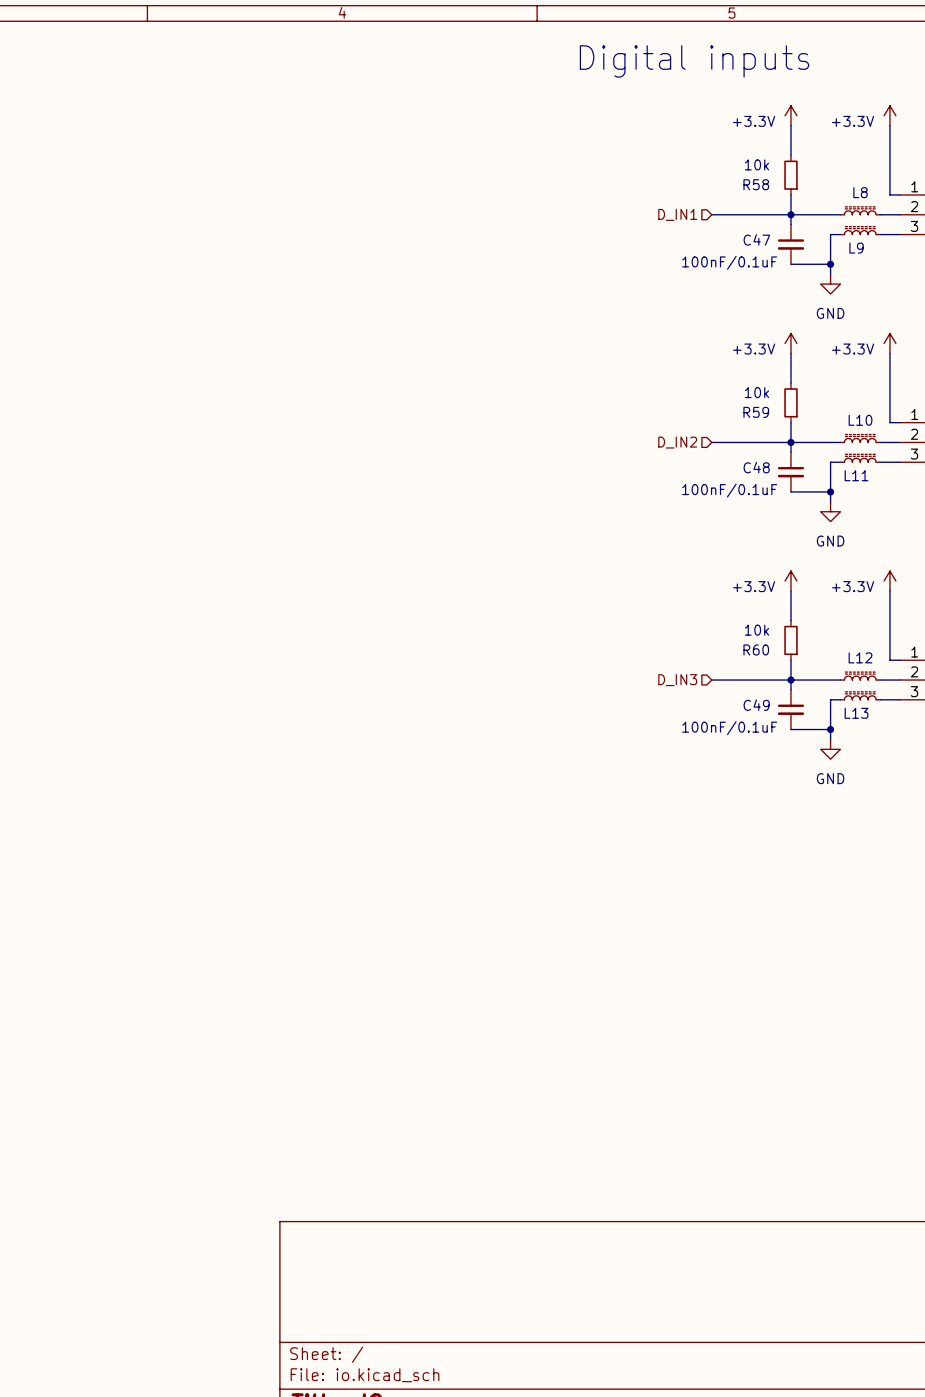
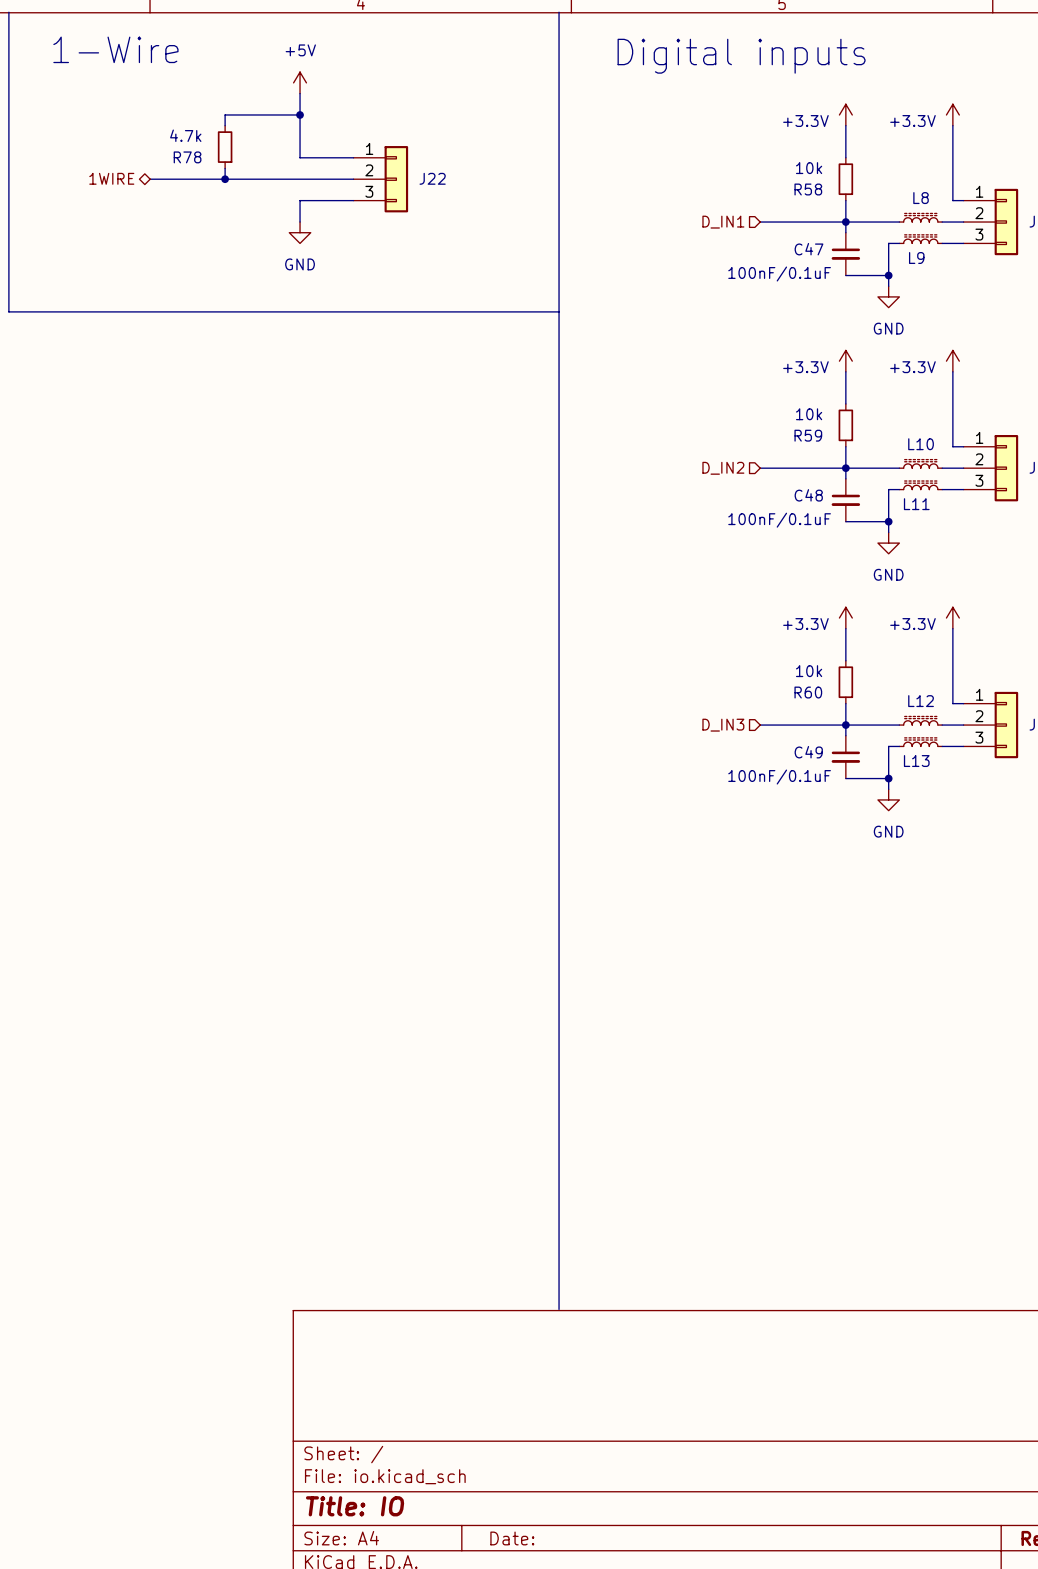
line: none -> (8, 12) (8, 311) (559, 311)
line: none -> (559, 12) (559, 1309)
text: none -> 1-Wire (115, 49)
power symbol: none -> +5V (300, 82)
wire: none -> (300, 93) (300, 157) (353, 157)
wire: none -> (300, 114) (225, 114) (225, 125)
junction: none -> (300, 114)
R78: none -> 4.7k (225, 147)
wire: none -> (225, 168) (225, 179)
hierarchical label: none -> 1WIRE (111, 178)
wire: none -> (150, 179) (353, 179)
junction: none -> (225, 179)
J22: none -> (380, 179)
wire: none -> (353, 200) (300, 200) (300, 222)
power symbol: none -> GND (300, 232)

